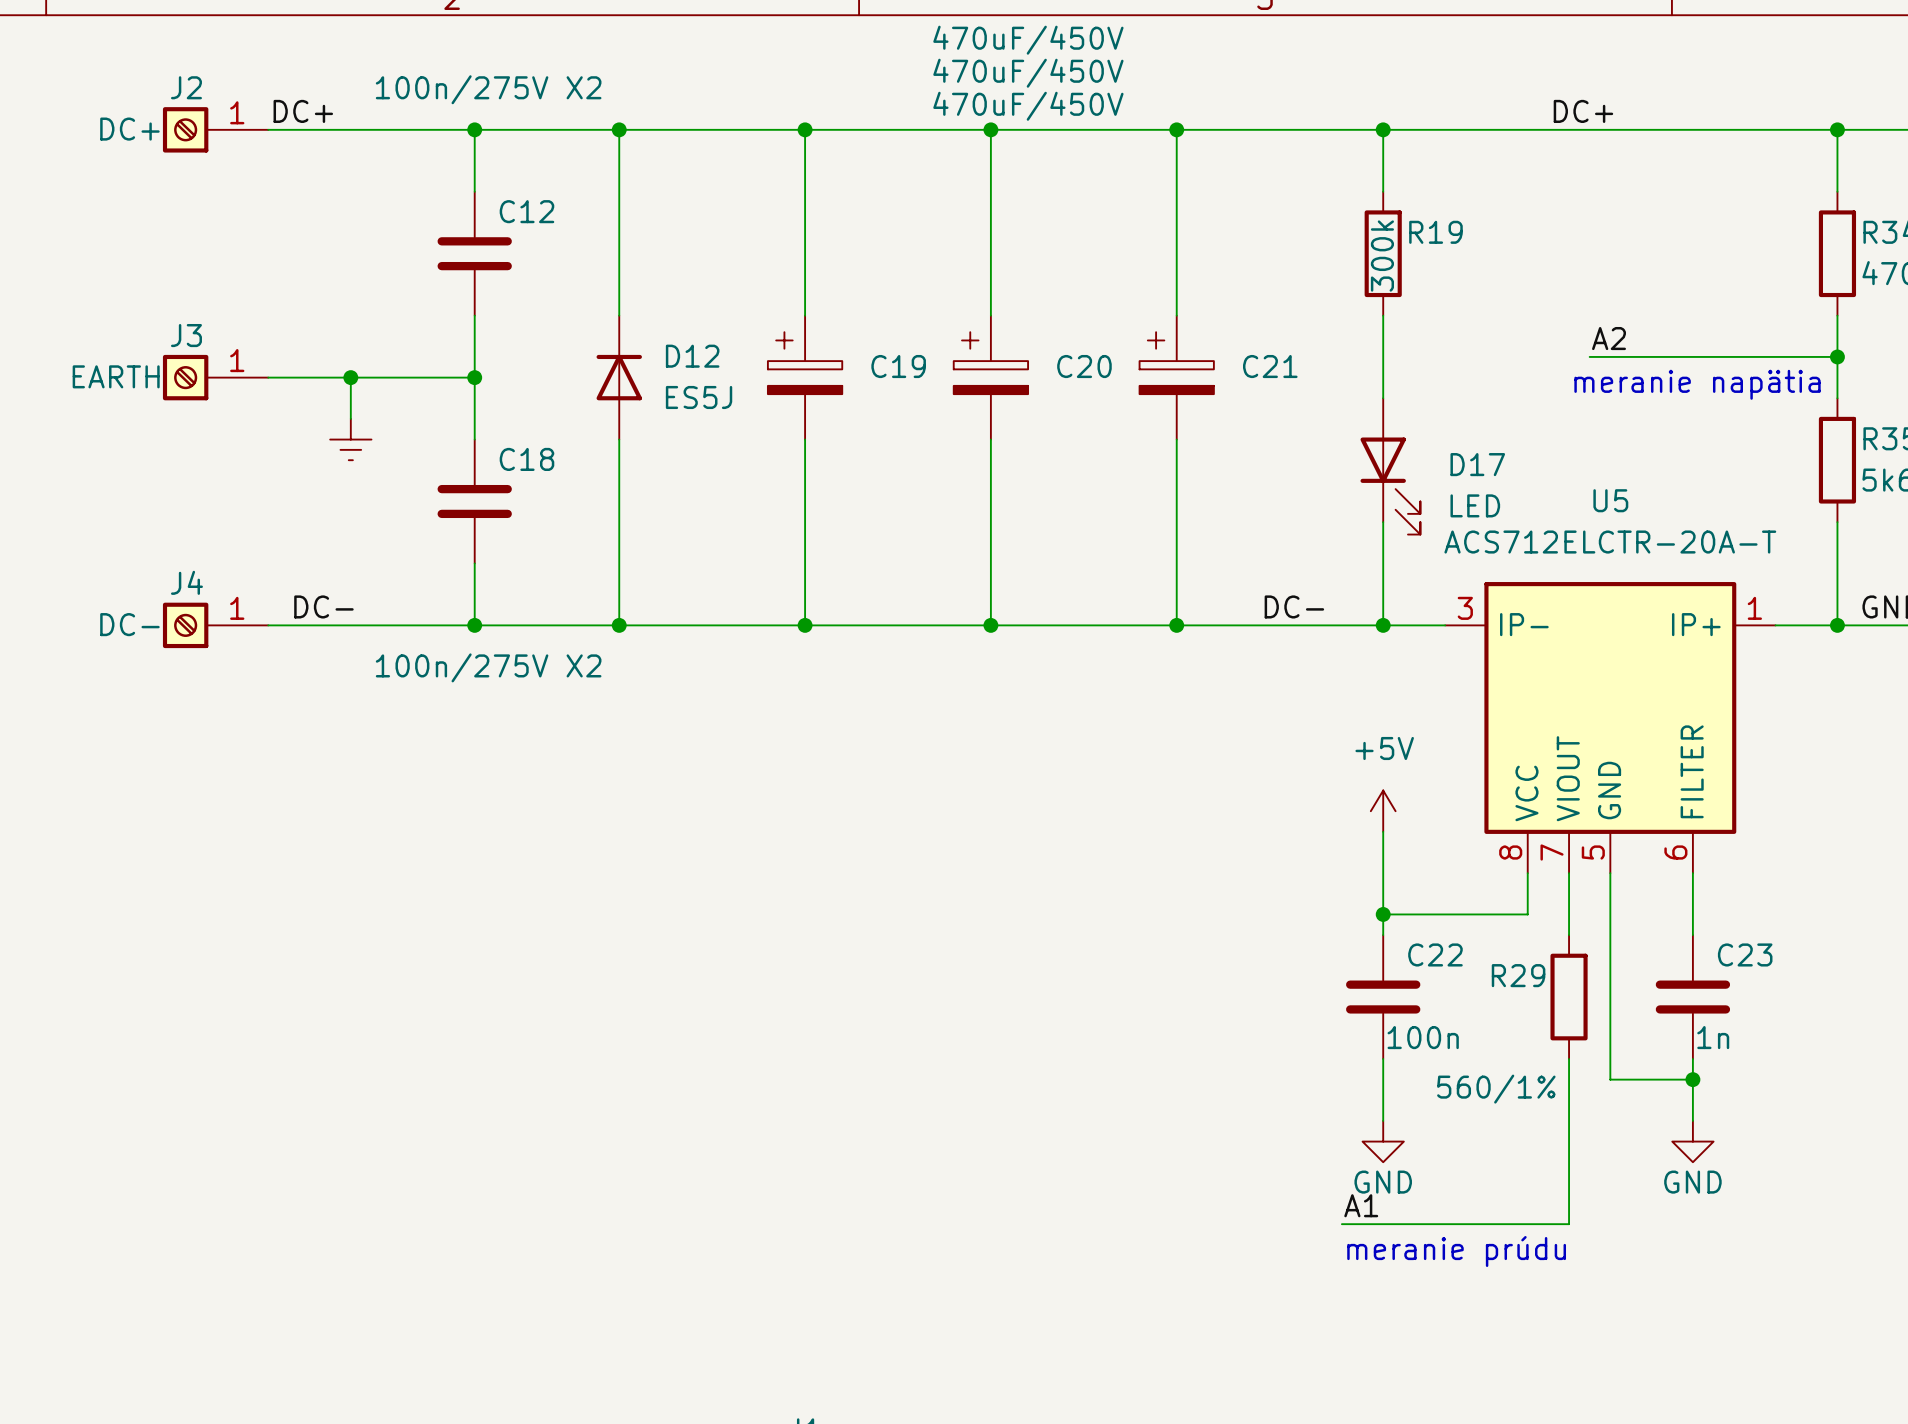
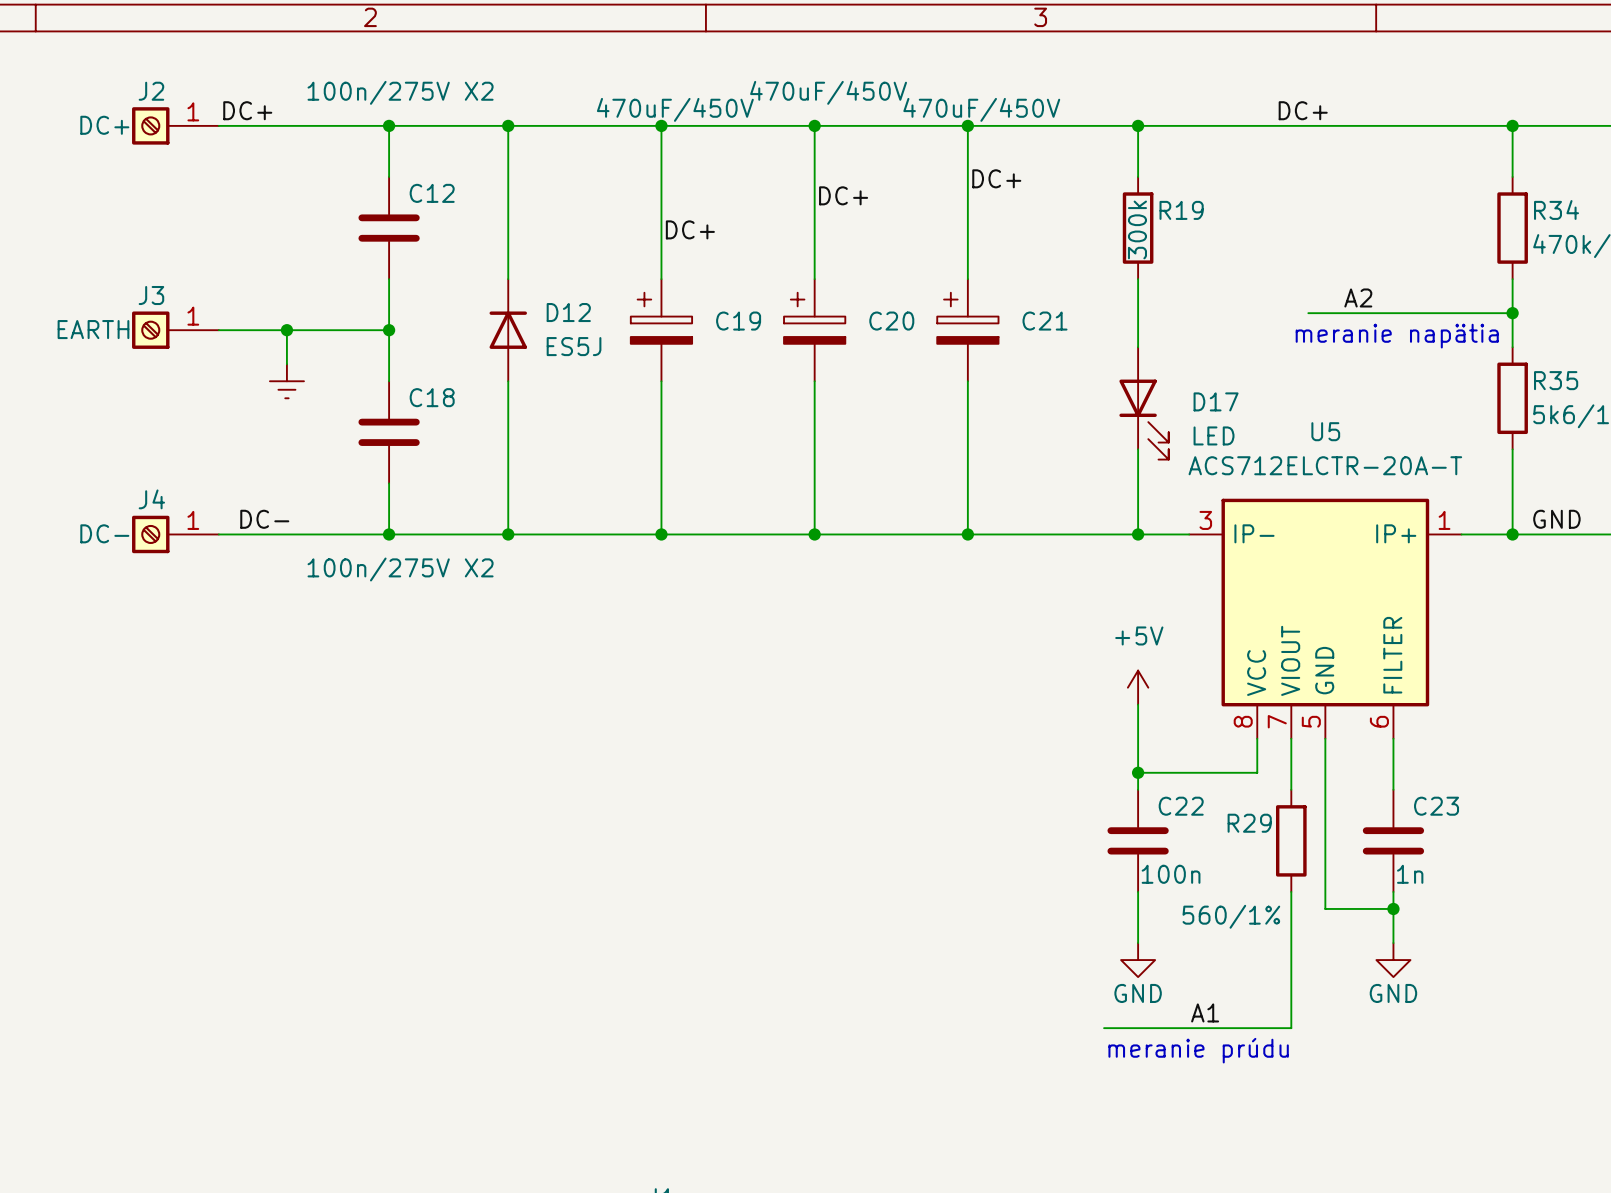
C20 value position: 470uF/450V (1028, 40) -> 470uF/450V (828, 92)
C21 value position: 470uF/450V (1028, 73) -> 470uF/450V (981, 109)
C19 value position: 470uF/450V (1028, 106) -> 470uF/450V (675, 109)
label: none -> DC+ (996, 178)
label: none -> DC+ (843, 195)
label: none -> DC+ (690, 229)
label position: A2 (1609, 338) -> A2 (1358, 297)
label: DC- (1294, 606) -> none
label position: A1 (1361, 1205) -> A1 (1205, 1012)

